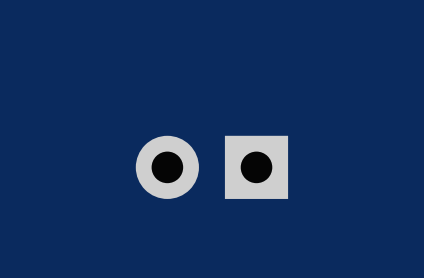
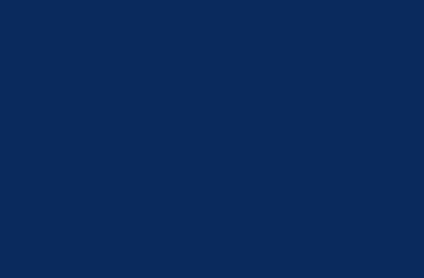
part: (211, 167) -> none

